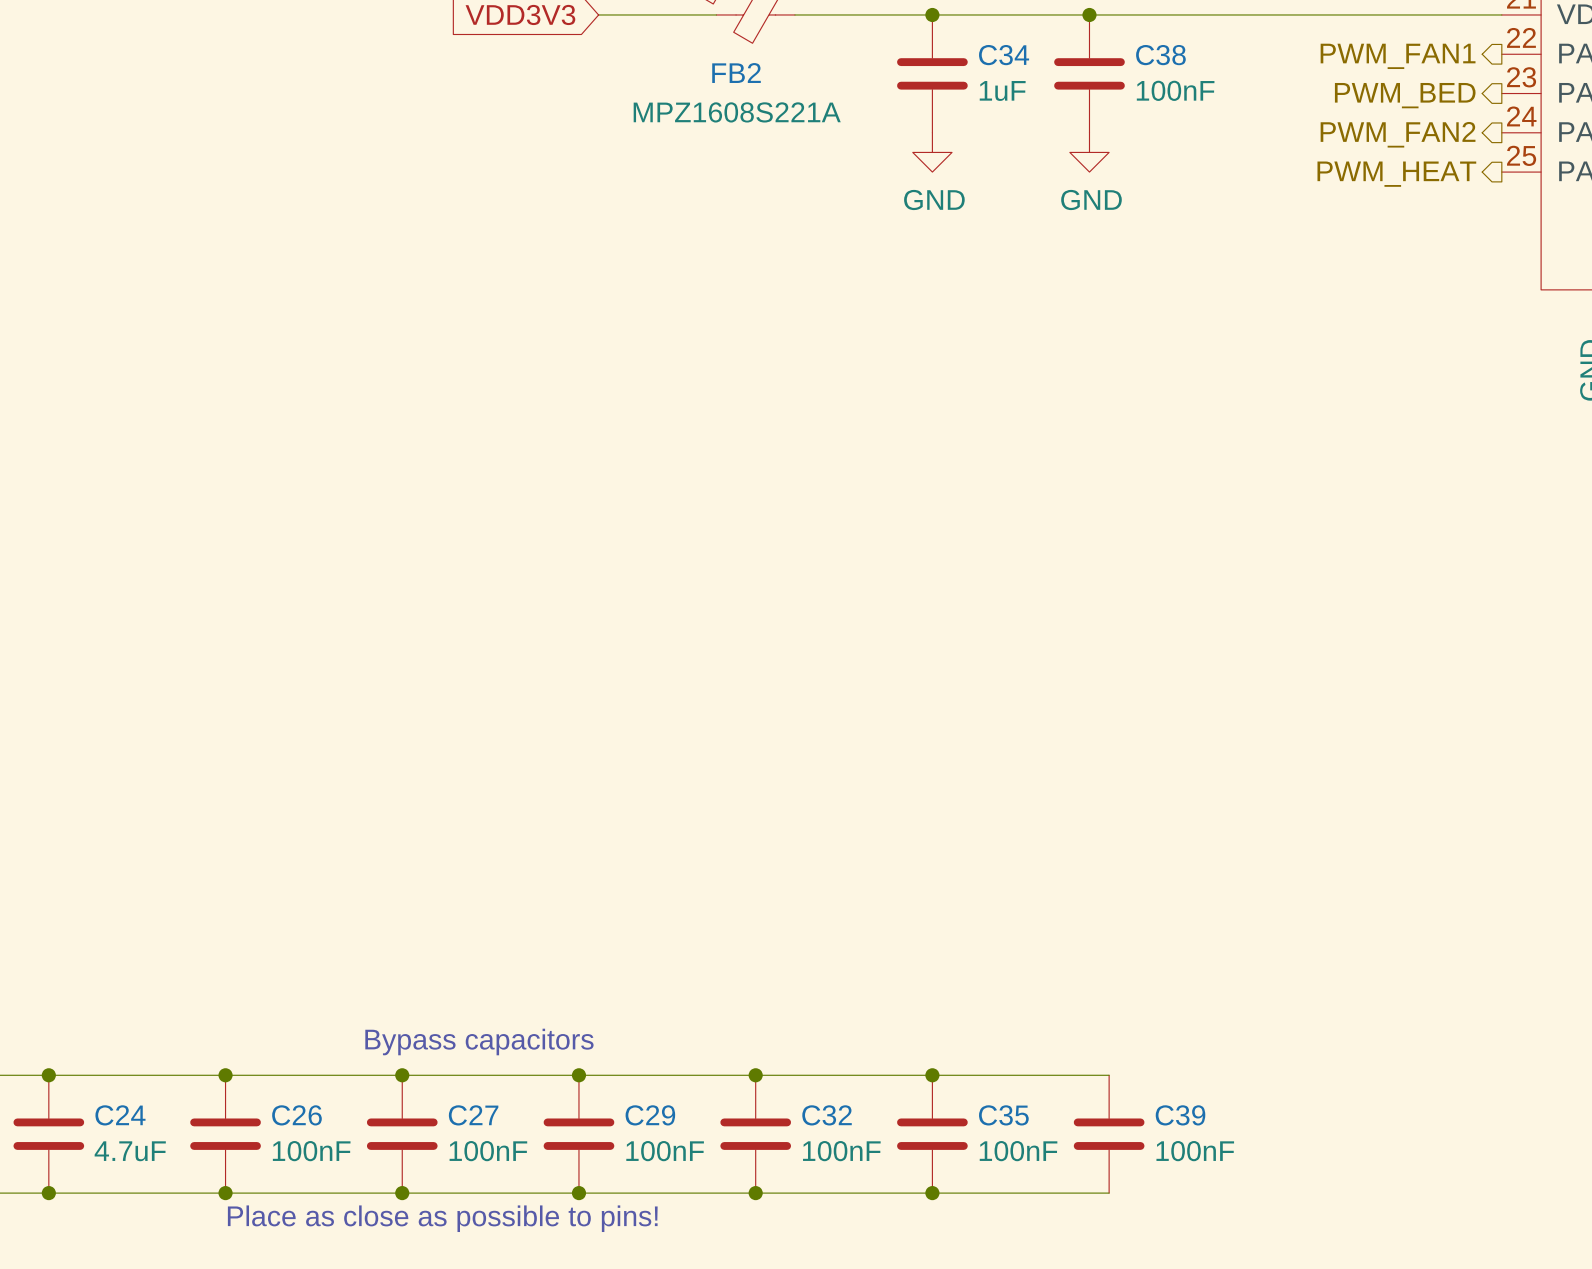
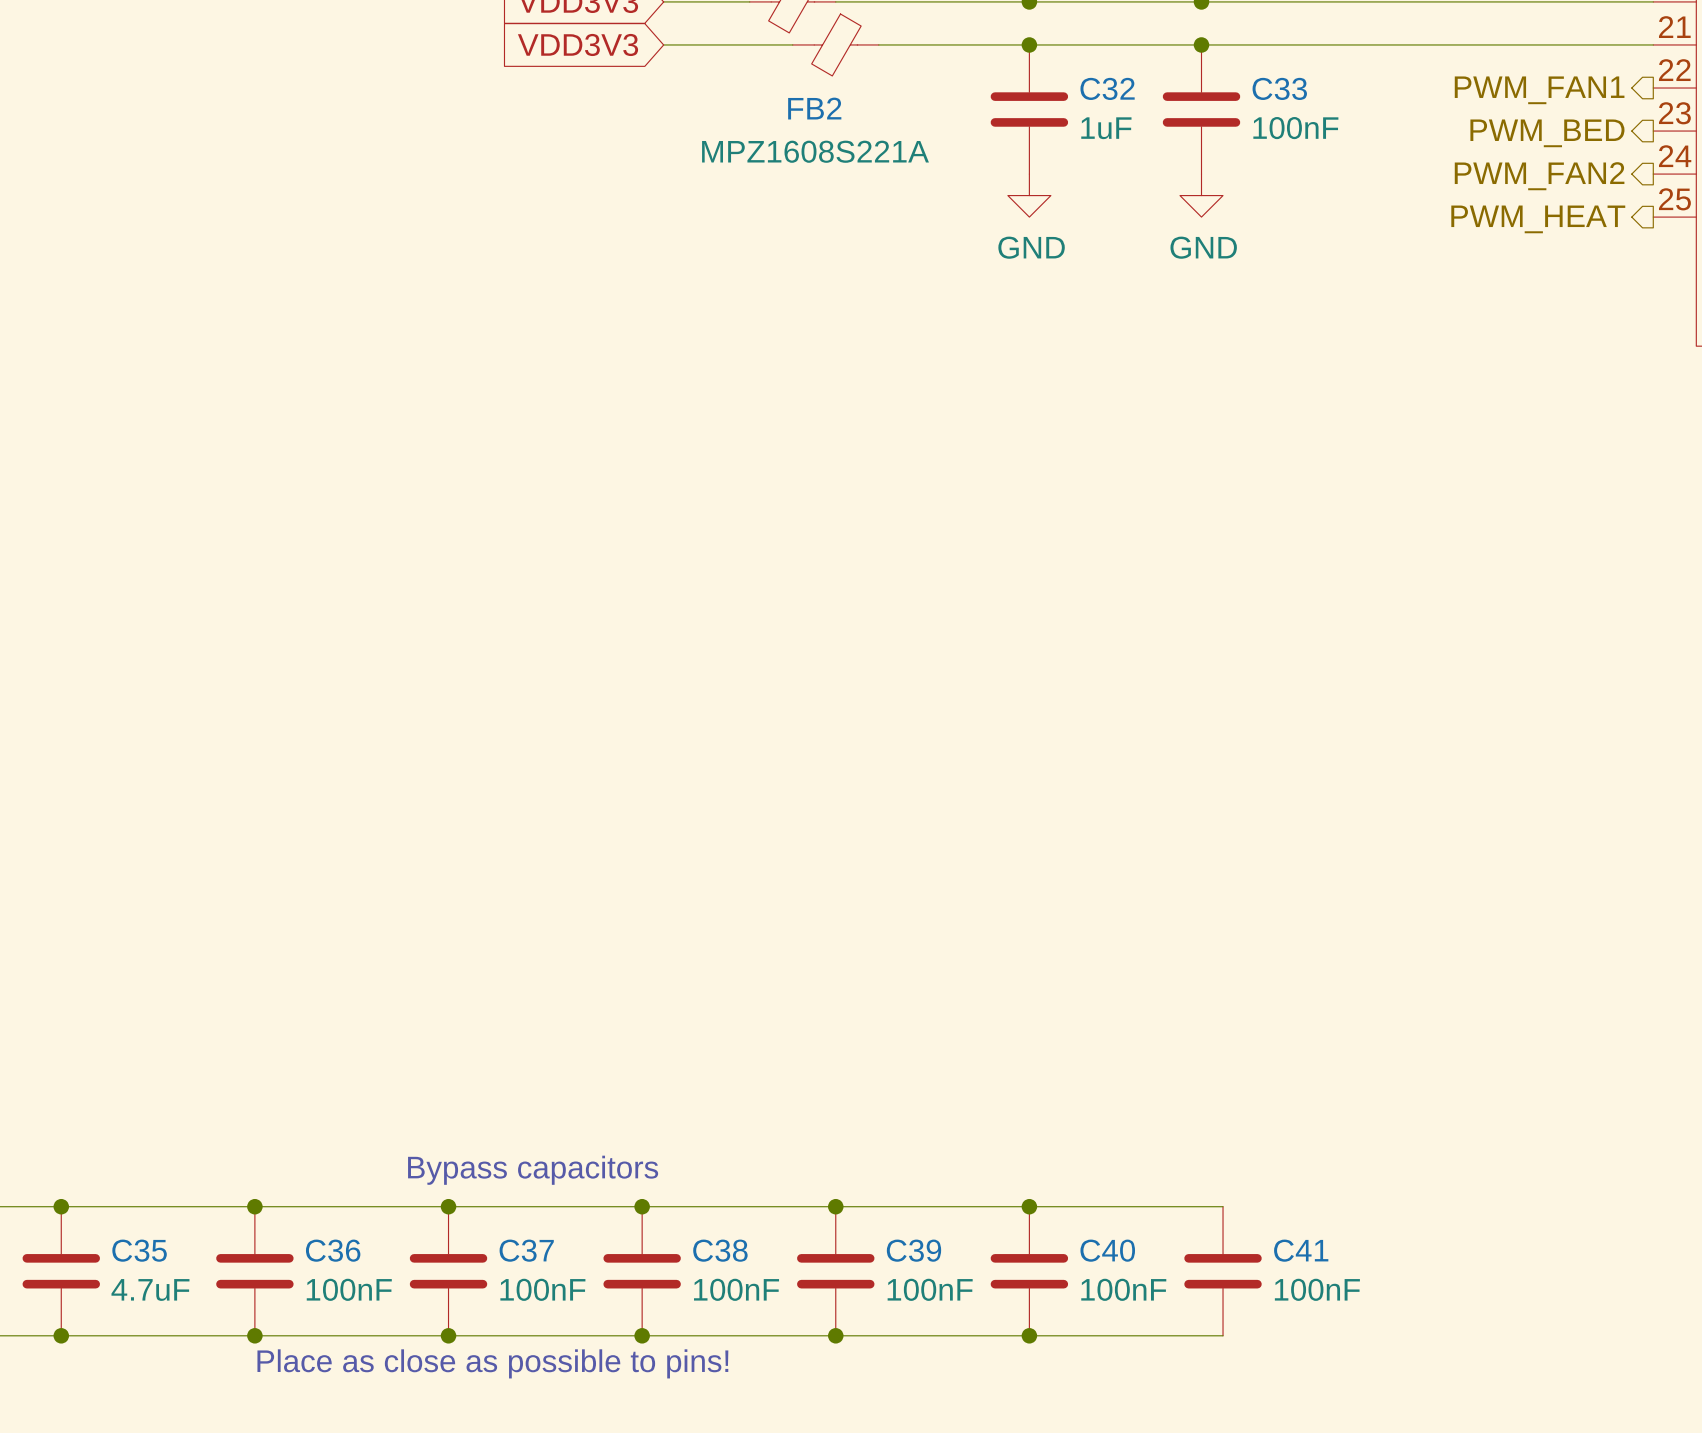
C34 name: C34 (1004, 55) -> C32 (1107, 88)
C38 name: C38 (1160, 55) -> C33 (1279, 88)
C24 name: C24 (120, 1115) -> C35 (139, 1250)
C26 name: C26 (296, 1115) -> C36 (333, 1250)
C27 name: C27 (473, 1115) -> C37 (526, 1250)
C29 name: C29 (650, 1115) -> C38 (720, 1250)
C32 name: C32 (827, 1115) -> C39 (913, 1250)
C35 name: C35 (1003, 1115) -> C40 (1107, 1250)
C39 name: C39 (1180, 1115) -> C41 (1301, 1250)

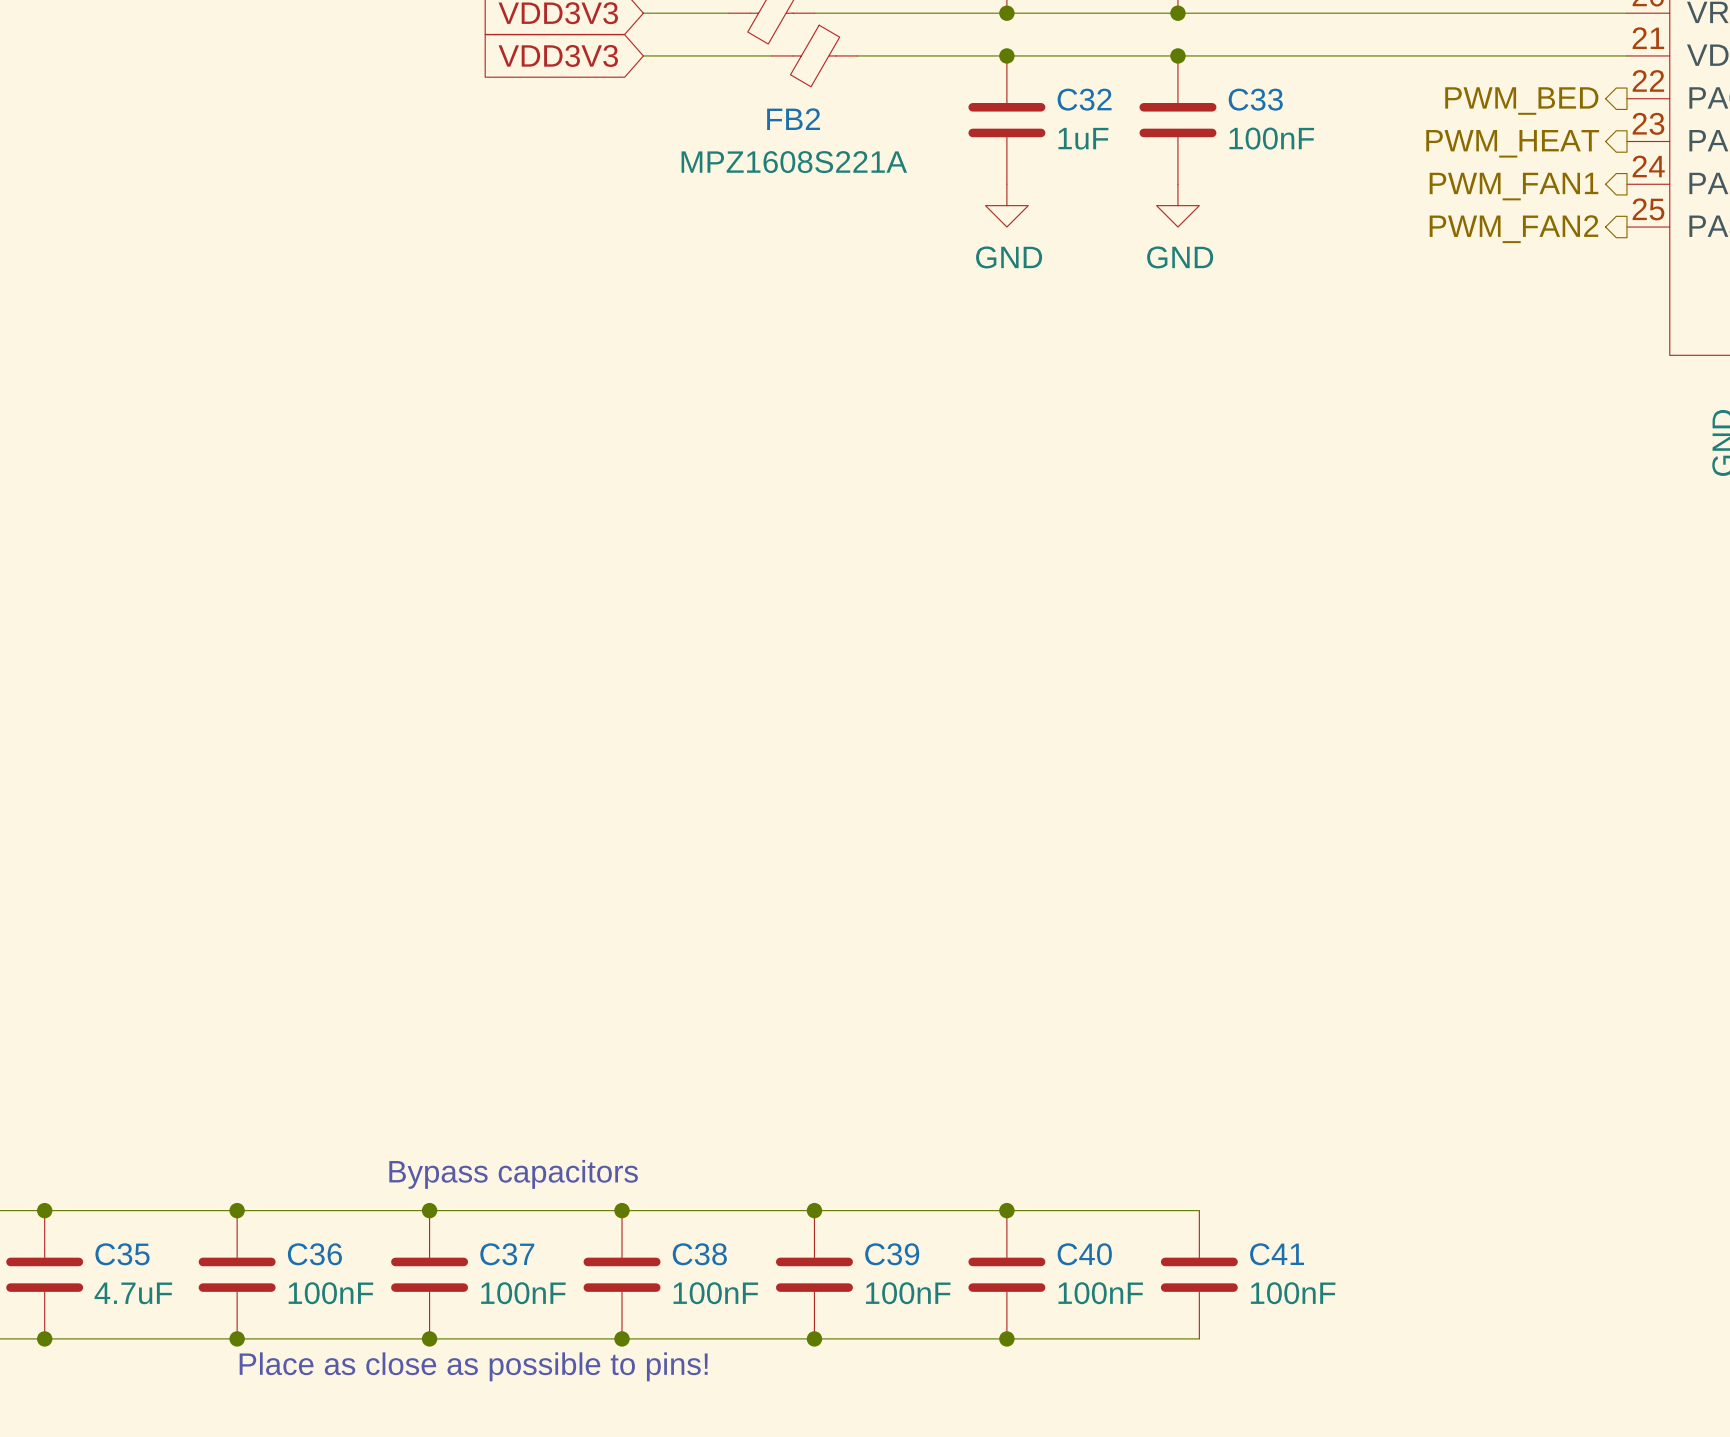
hierarchical label: PWM_FAN1 (1539, 90) -> PWM_BED (1521, 101)
hierarchical label: PWM_BED (1547, 133) -> PWM_HEAT (1512, 143)
hierarchical label: PWM_FAN2 (1539, 176) -> PWM_FAN1 (1514, 186)
hierarchical label: PWM_HEAT (1538, 219) -> PWM_FAN2 (1513, 229)

